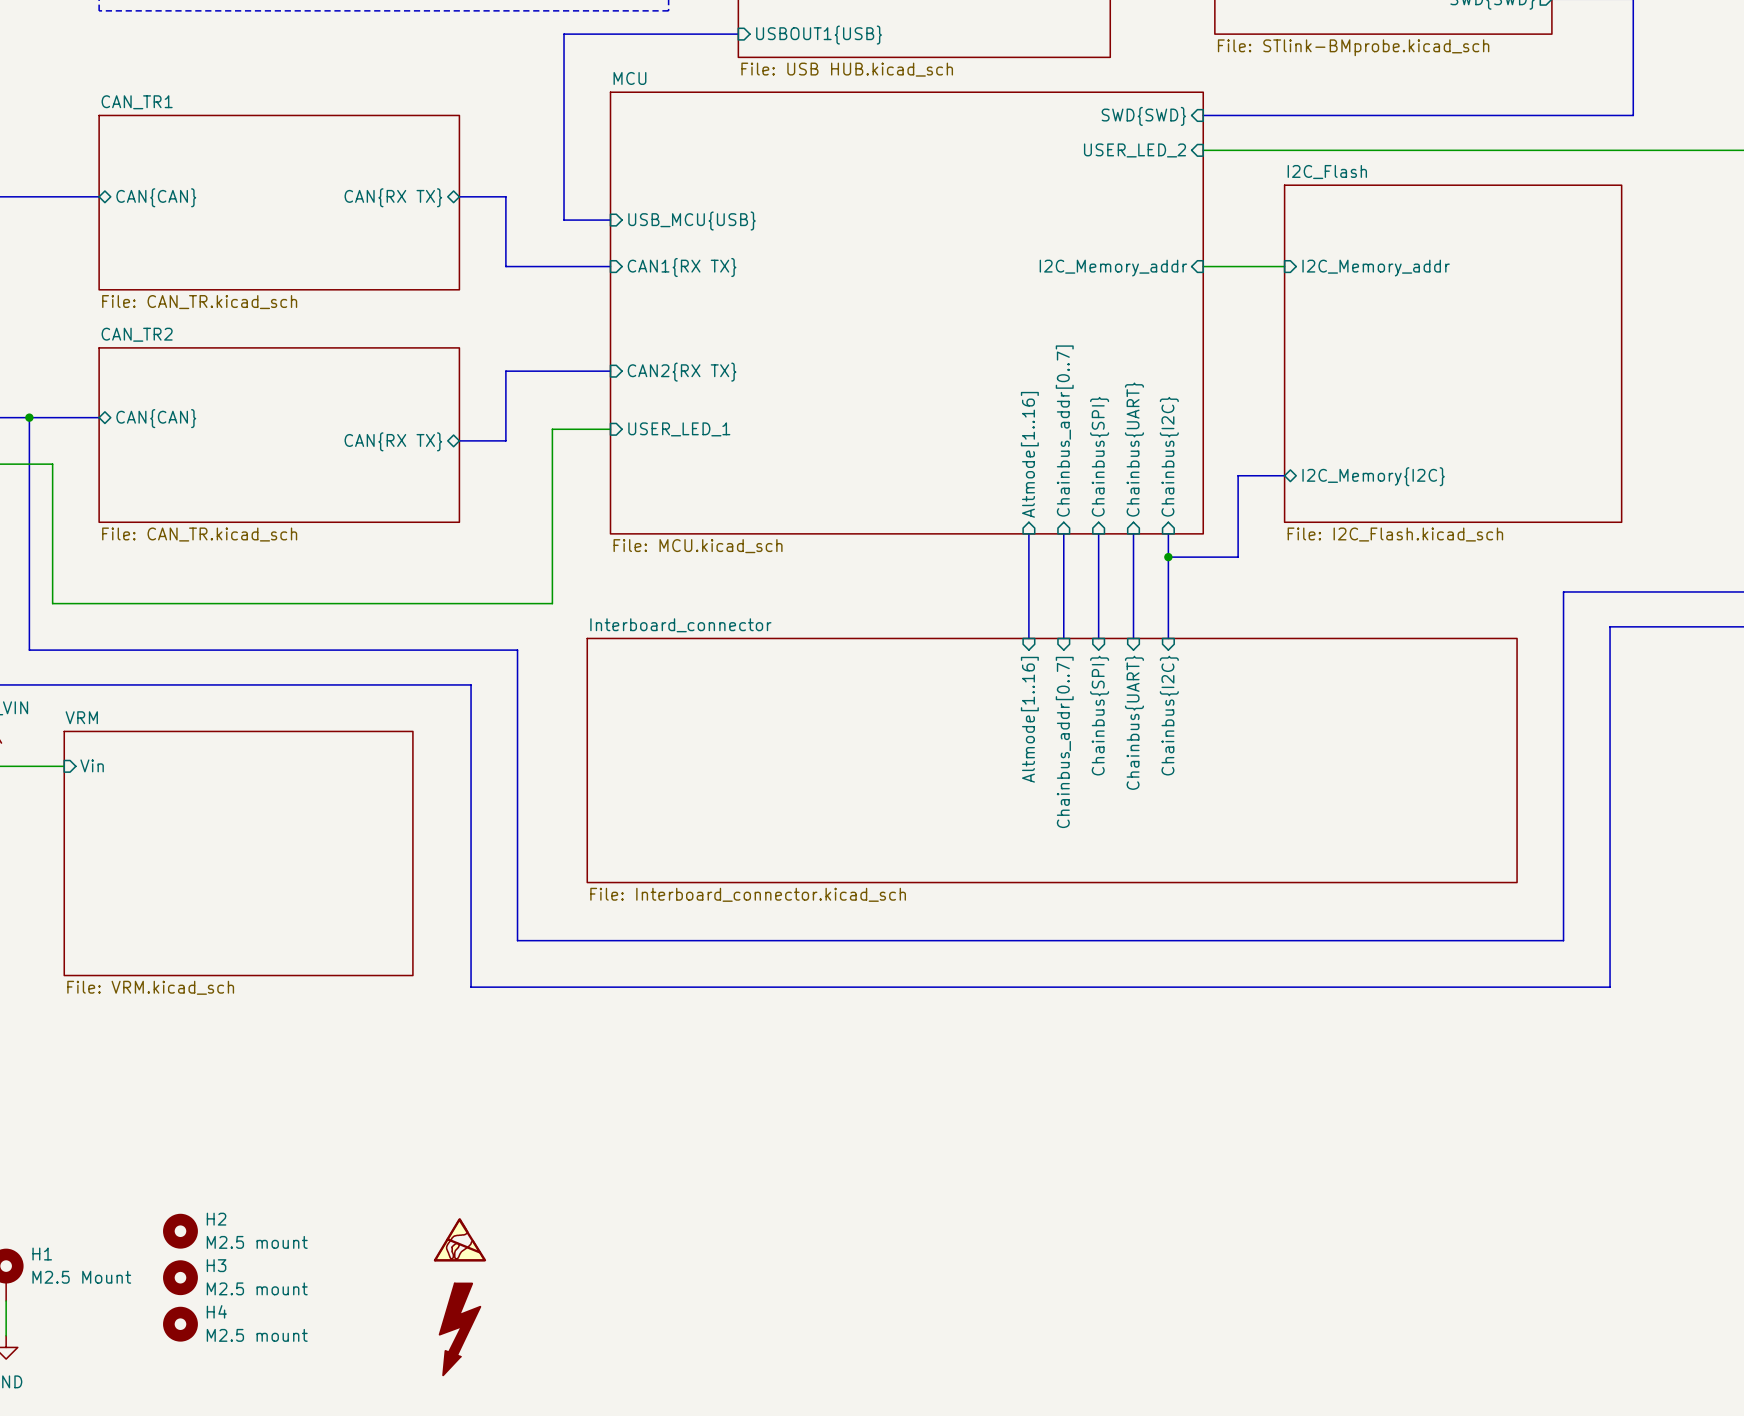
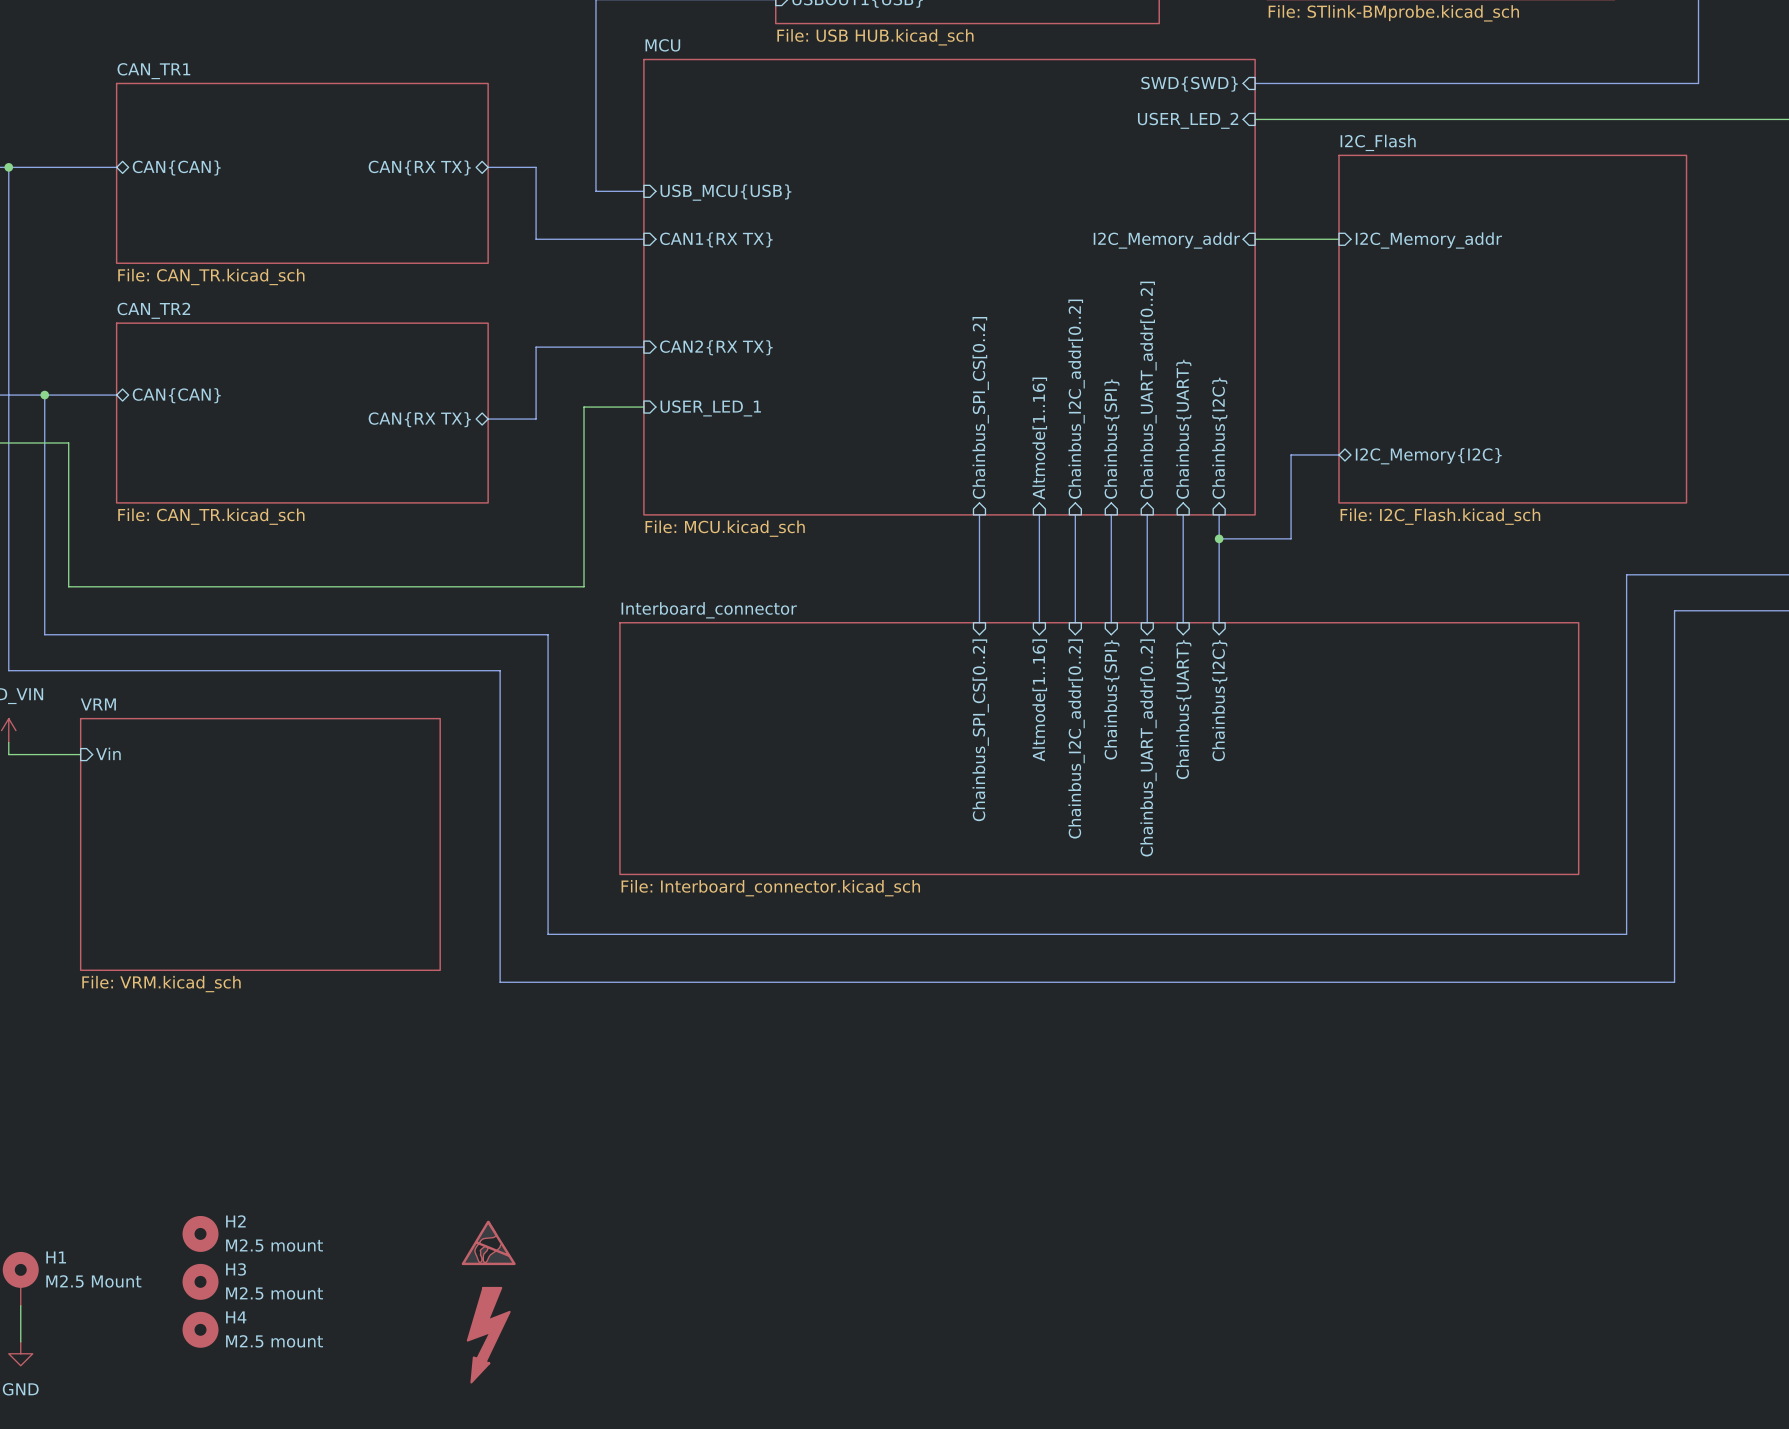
sheet pin: none -> Chainbus_SPI_CS[0..2] (980, 407)
sheet pin: Chainbus_addr[0..7] (1064, 431) -> Chainbus{SPI} (1111, 439)
sheet pin: none -> Altmode[1..16] (1039, 438)
sheet pin: Altmode[1..16] (1029, 454) -> Chainbus_I2C_addr[0..2] (1076, 399)
sheet pin: Chainbus{SPI} (1099, 456) -> Chainbus_UART_addr[0..2] (1148, 390)
bus: none -> (979, 514) (979, 622)
bus: none -> (1039, 514) (1039, 622)
sheet pin: Chainbus{SPI} (1099, 715) -> Chainbus_UART_addr[0..2] (1148, 747)
sheet pin: none -> Altmode[1..16] (1039, 700)
sheet pin: Altmode[1..16] (1029, 719) -> Chainbus_I2C_addr[0..2] (1076, 738)
sheet pin: Chainbus_addr[0..7] (1064, 742) -> Chainbus{SPI} (1111, 699)
sheet pin: none -> Chainbus_SPI_CS[0..2] (980, 730)

